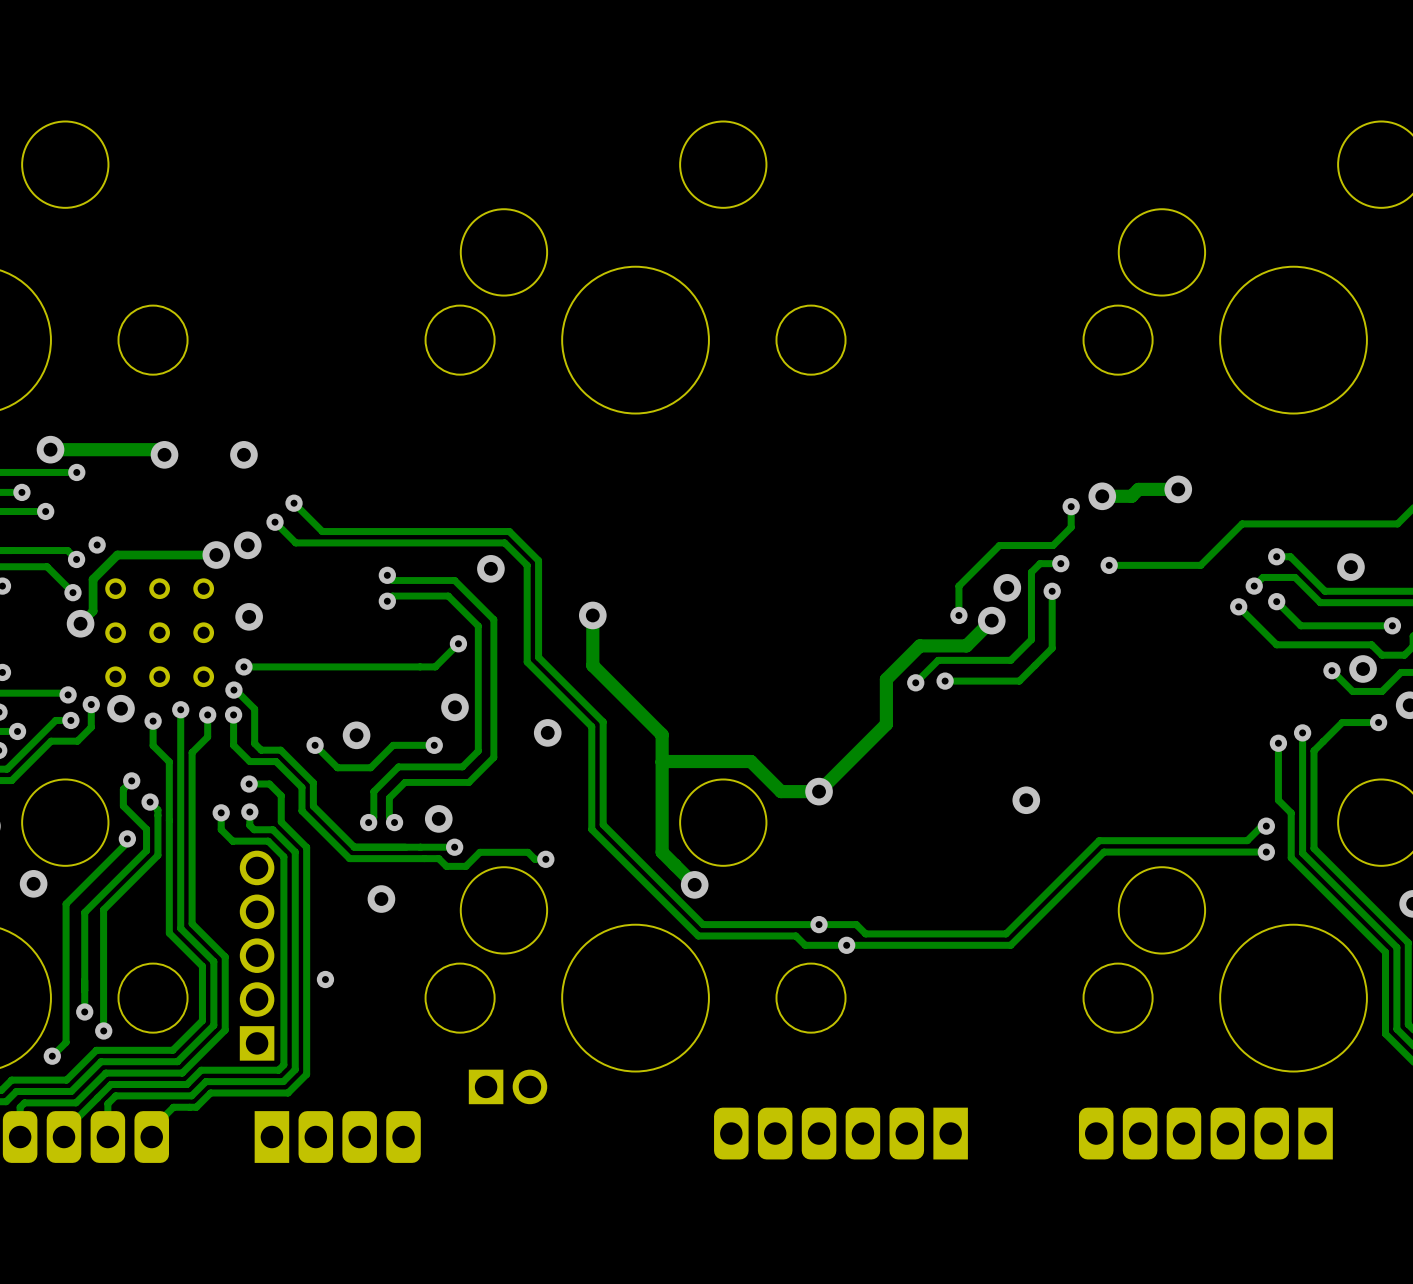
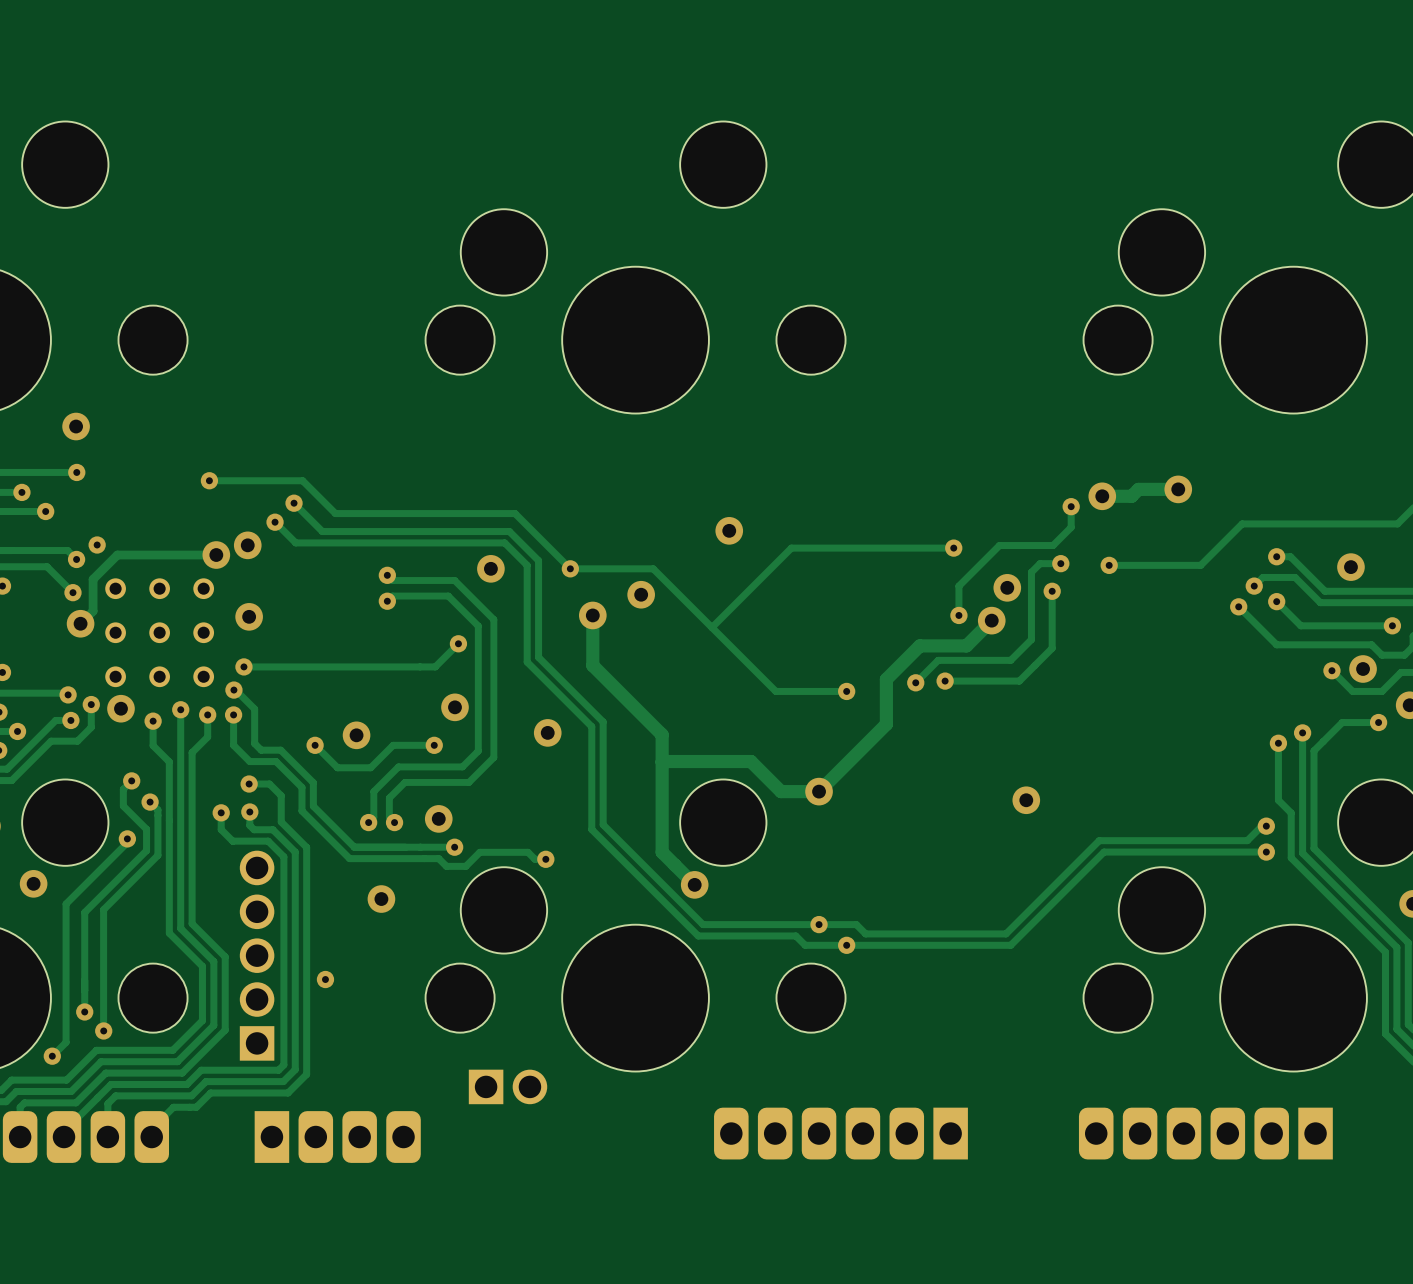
track: (50, 449) (159, 449) (164, 454) -> none
via position: (50, 449) -> (76, 426)
via: (164, 454) -> none
via: (243, 454) -> none
track: none -> (209, 480) (302, 480) (335, 513) (515, 513) (570, 568) (653, 568) (775, 691) (846, 691)
via: none -> (209, 480)
via: none -> (729, 530)
track: none -> (953, 548) (791, 548) (711, 627)
via: none -> (953, 548)
via: none -> (570, 568)
via: none -> (641, 594)
via: none -> (846, 691)

